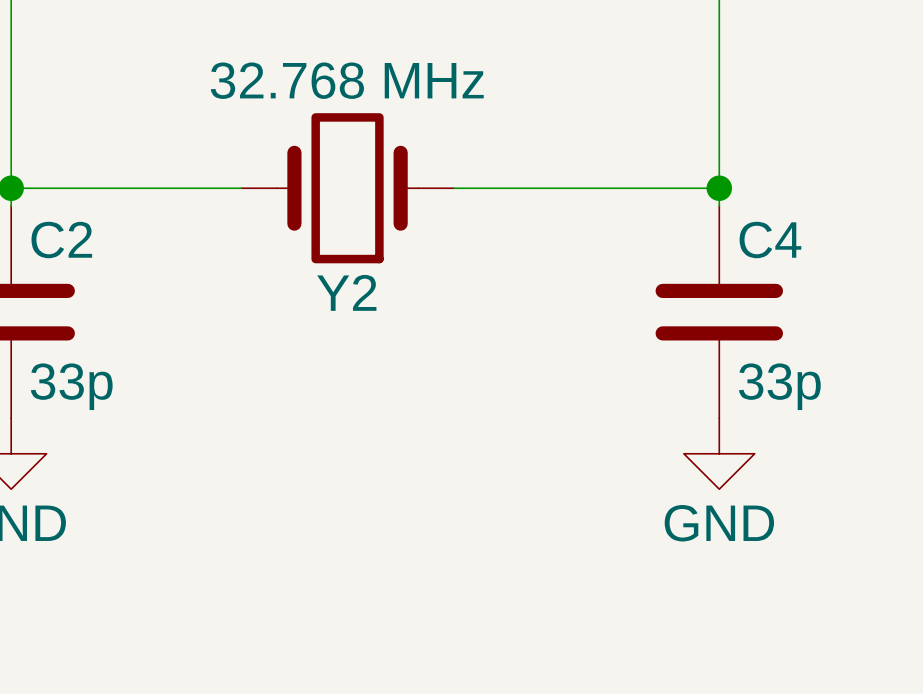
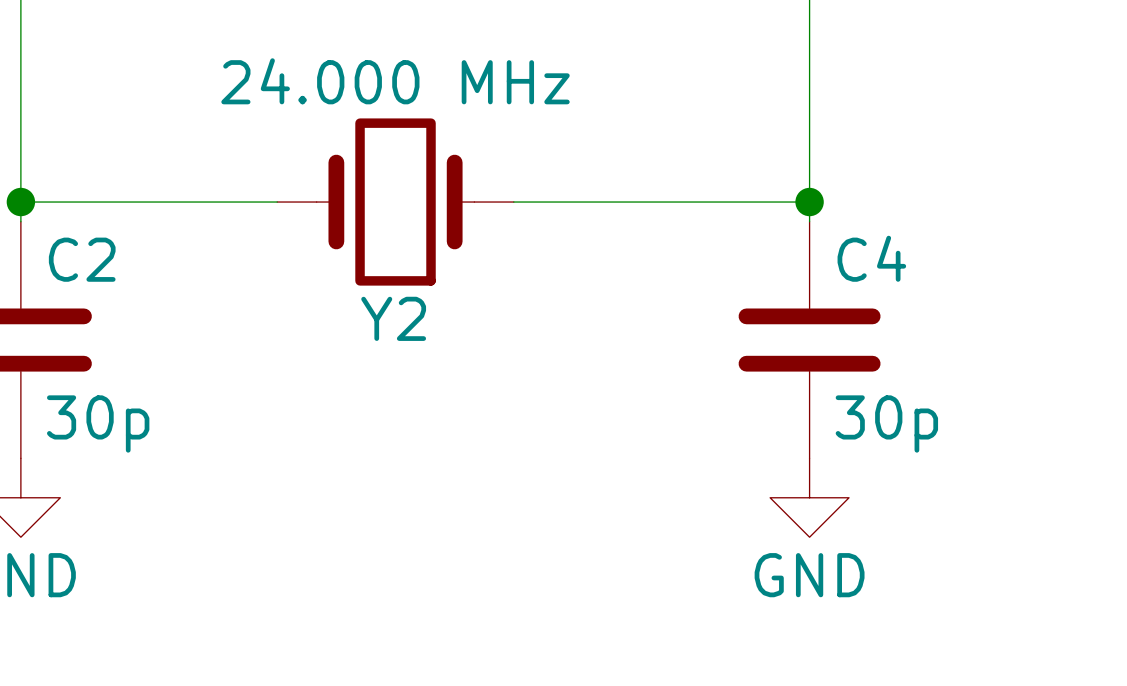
Y2 value: 32.768 MHz (347, 80) -> 24.000 MHz (395, 81)
C2 value: 33p (71, 386) -> 30p (98, 424)
C4 value: 33p (779, 386) -> 30p (886, 424)

